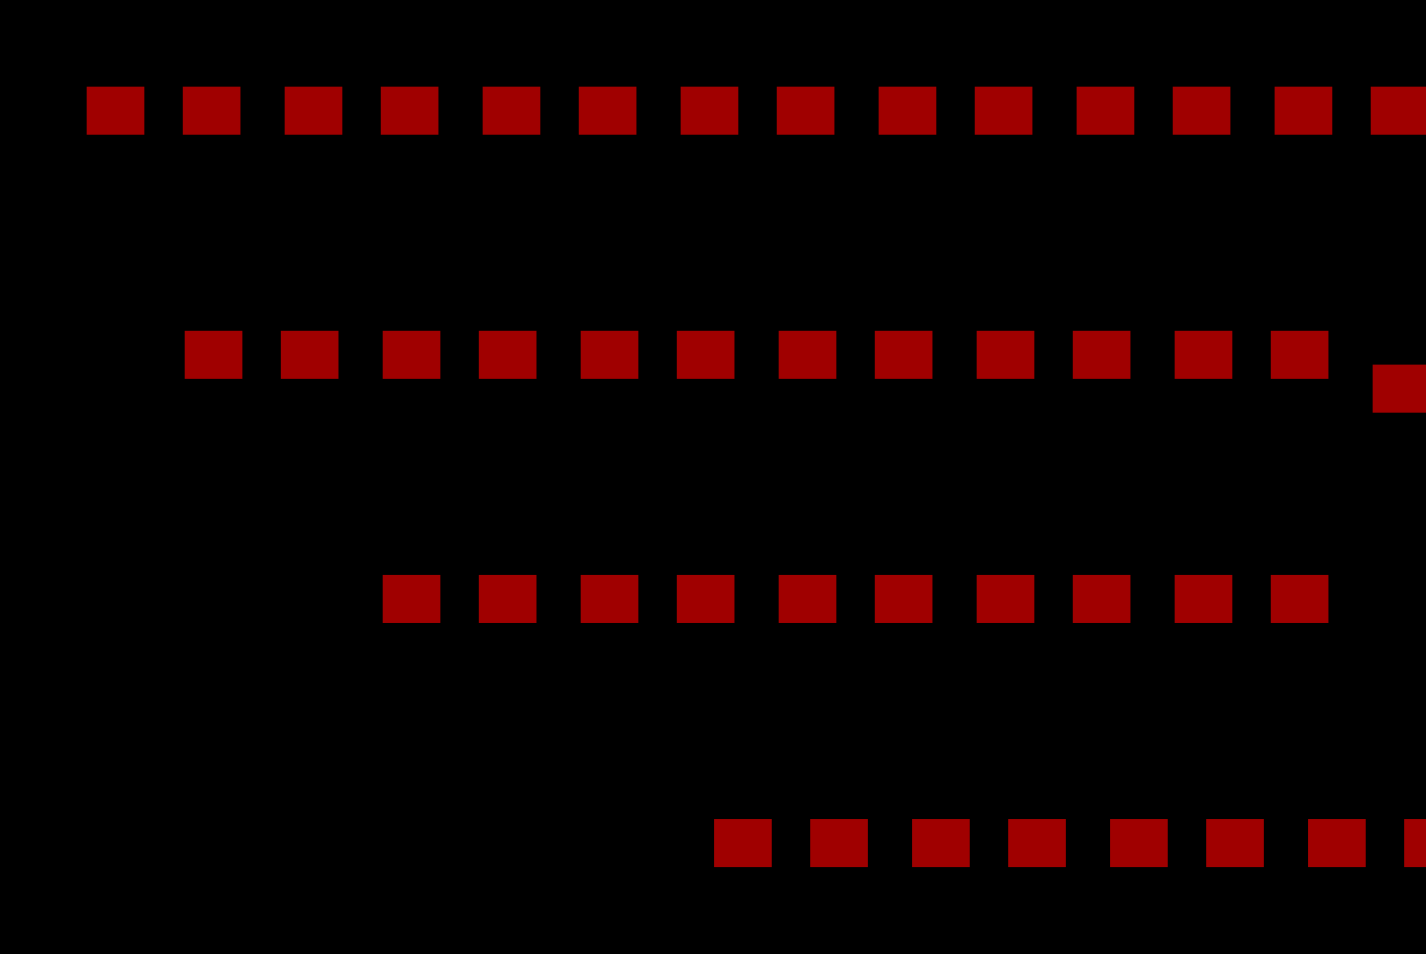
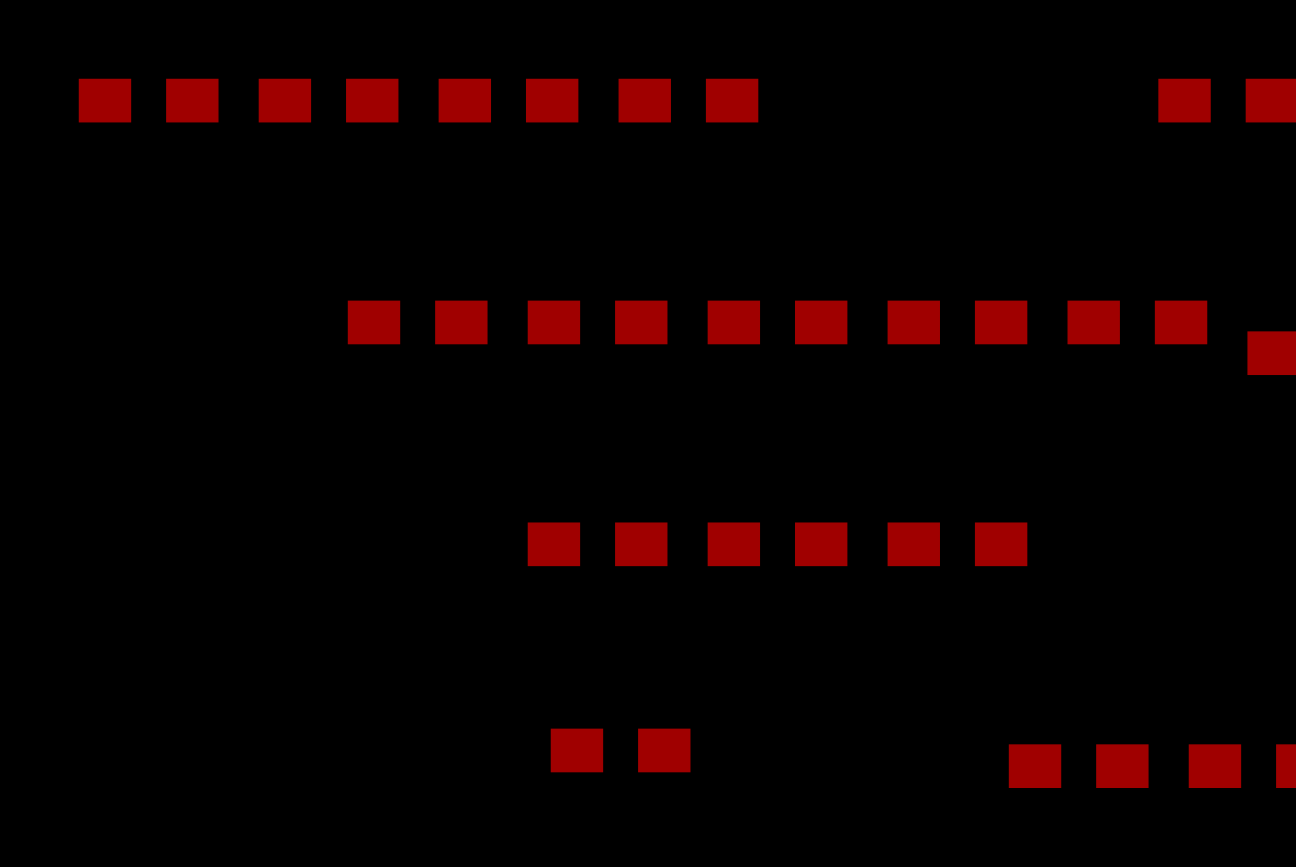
part: (955, 110) -> none
part: (1153, 110) -> none
part: (261, 354) -> none
part: (459, 598) -> none
part: (1251, 598) -> none
part position: (790, 843) -> (620, 750)
part: (988, 843) -> none

